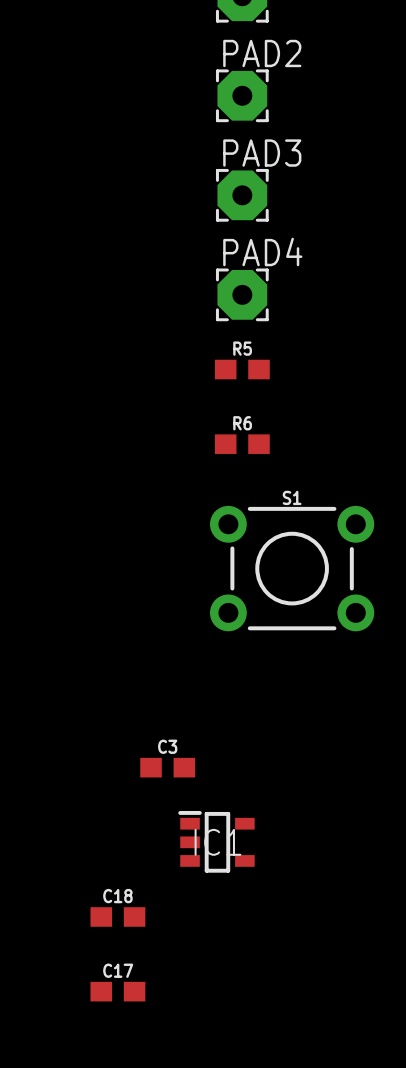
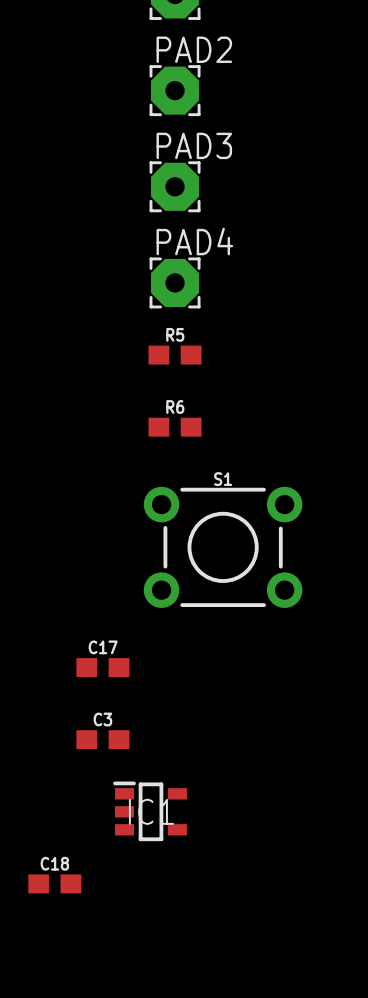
C17 position: (117, 991) -> (102, 667)

